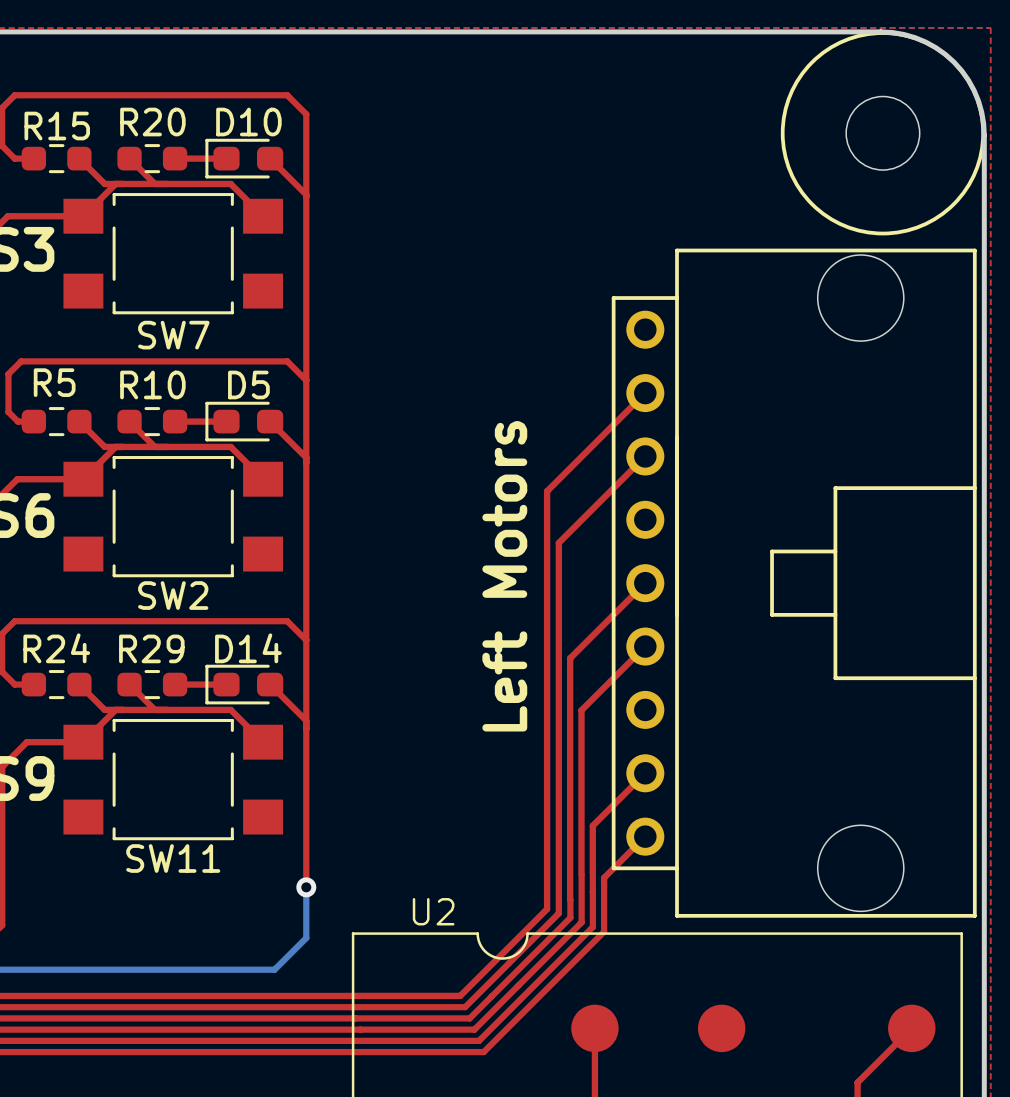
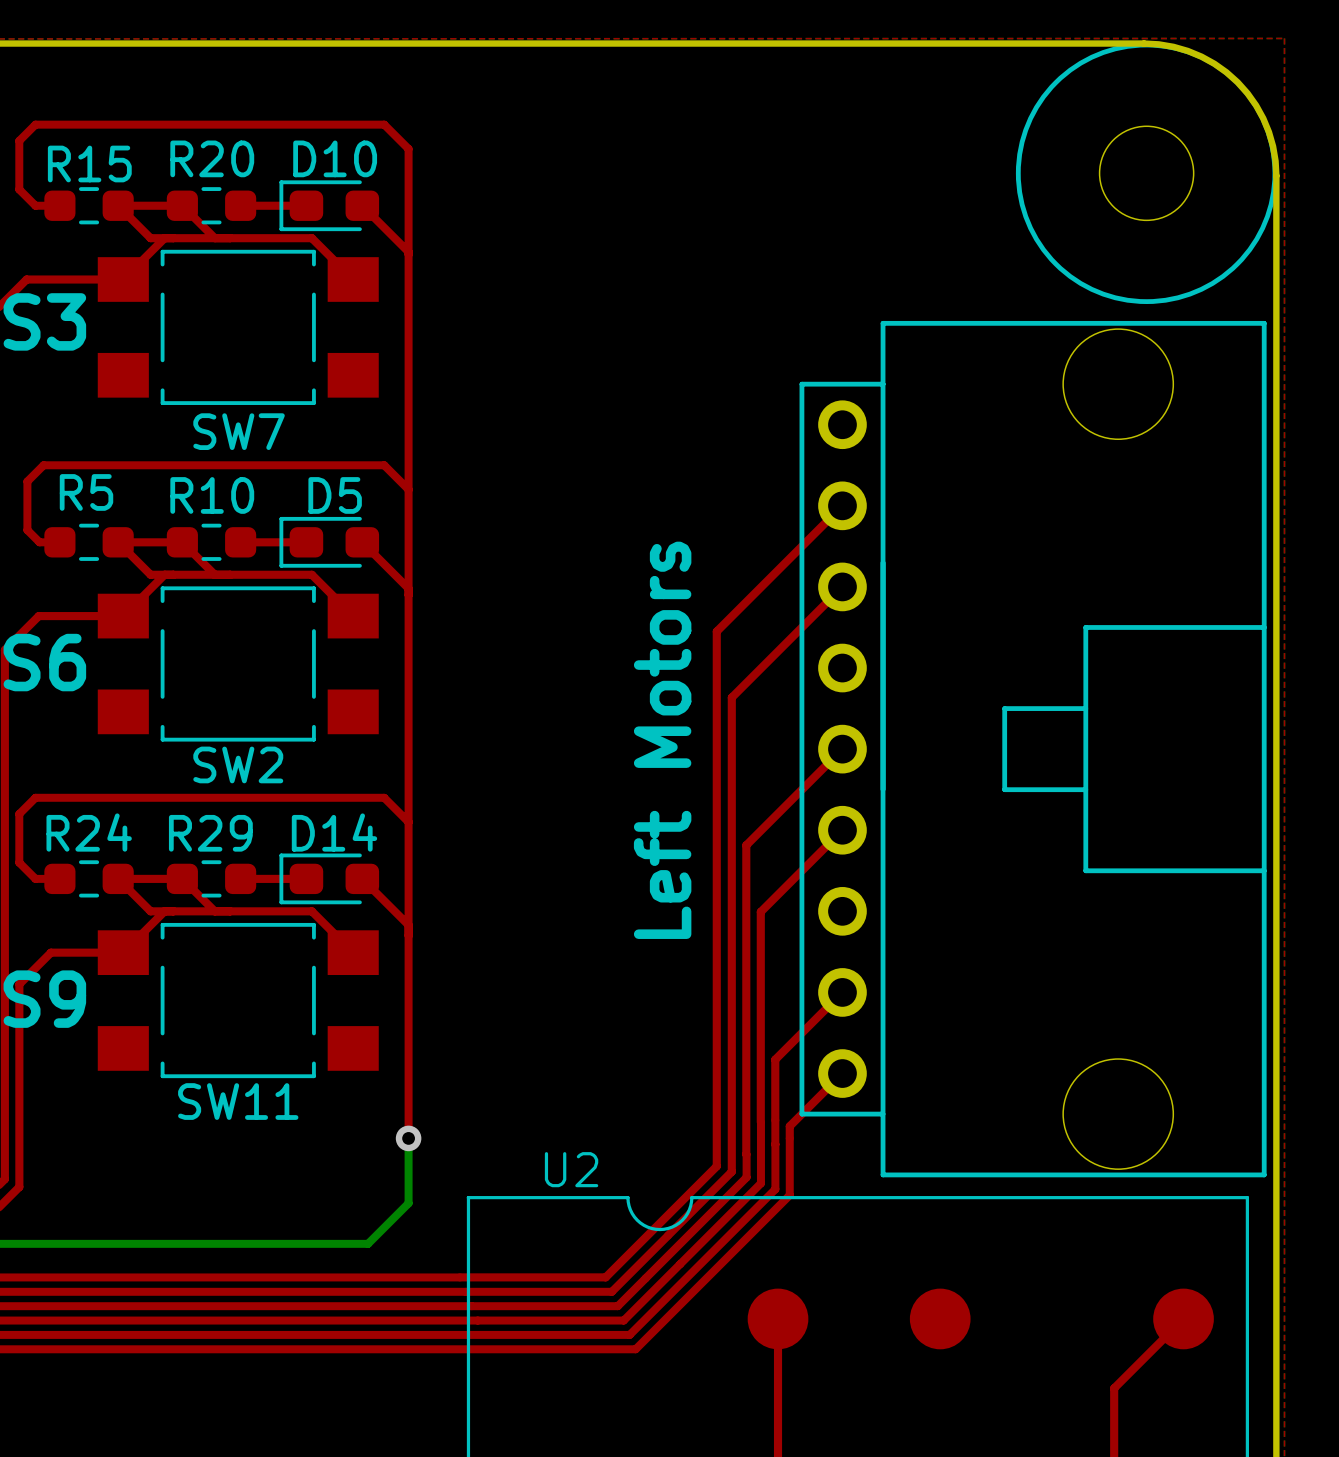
top track: none -> (118, 205) (182, 205)
top track: none -> (118, 542) (182, 542)
top track: none -> (118, 878) (182, 878)

